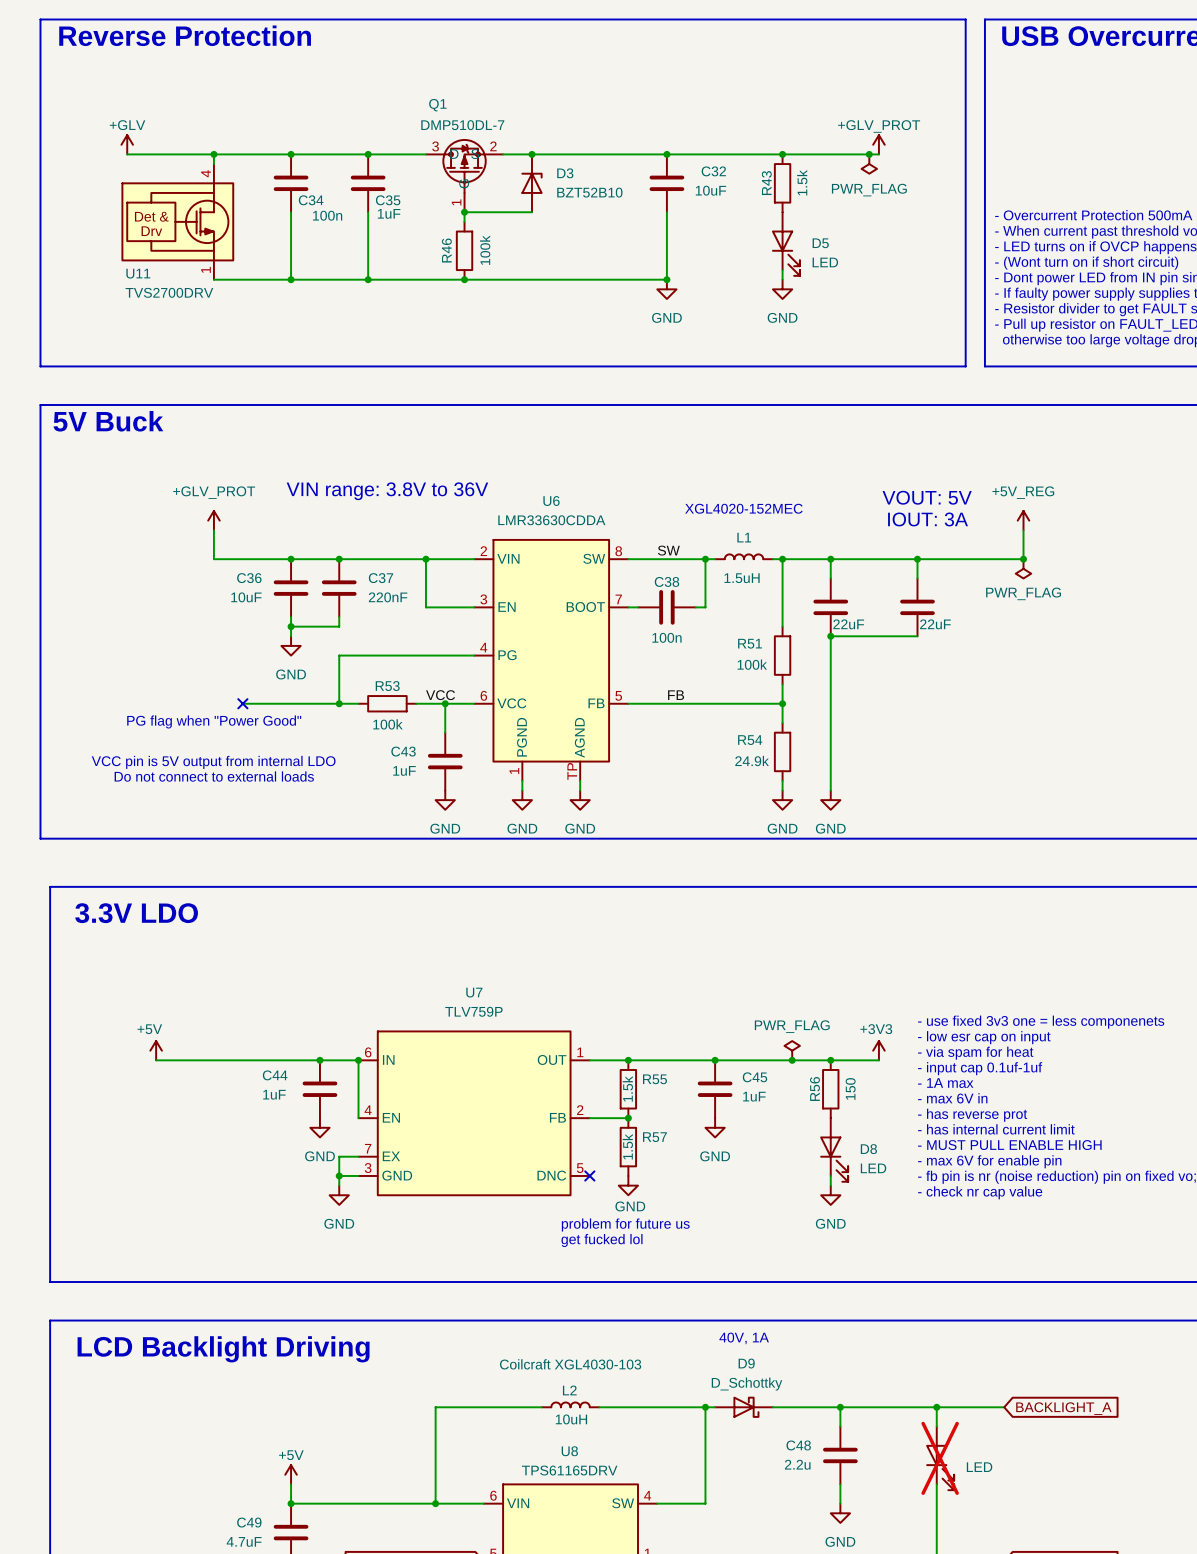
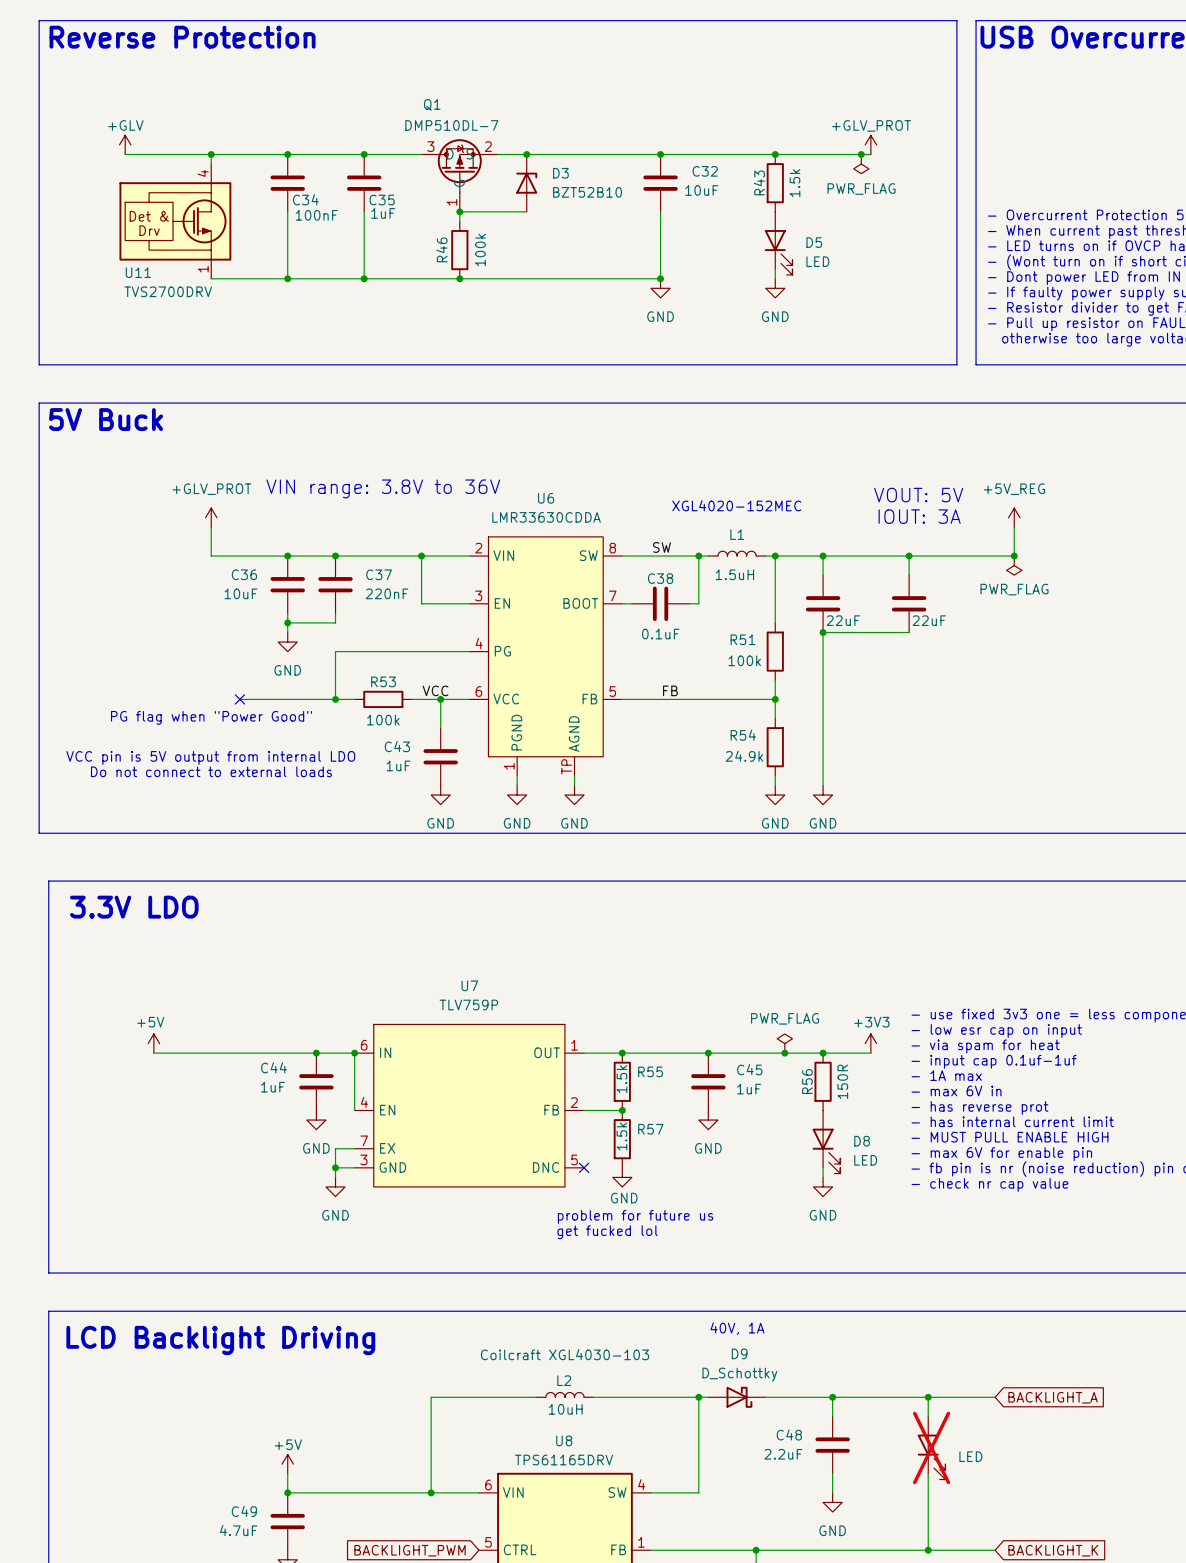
C34 value: 100n (327, 215) -> 100nF (316, 215)
C38 value: 100n (667, 637) -> 0.1uF (660, 634)
R56 value: 150 (850, 1088) -> 150R (842, 1081)
C48 value: 2.2u (797, 1464) -> 2.2uF (783, 1454)

